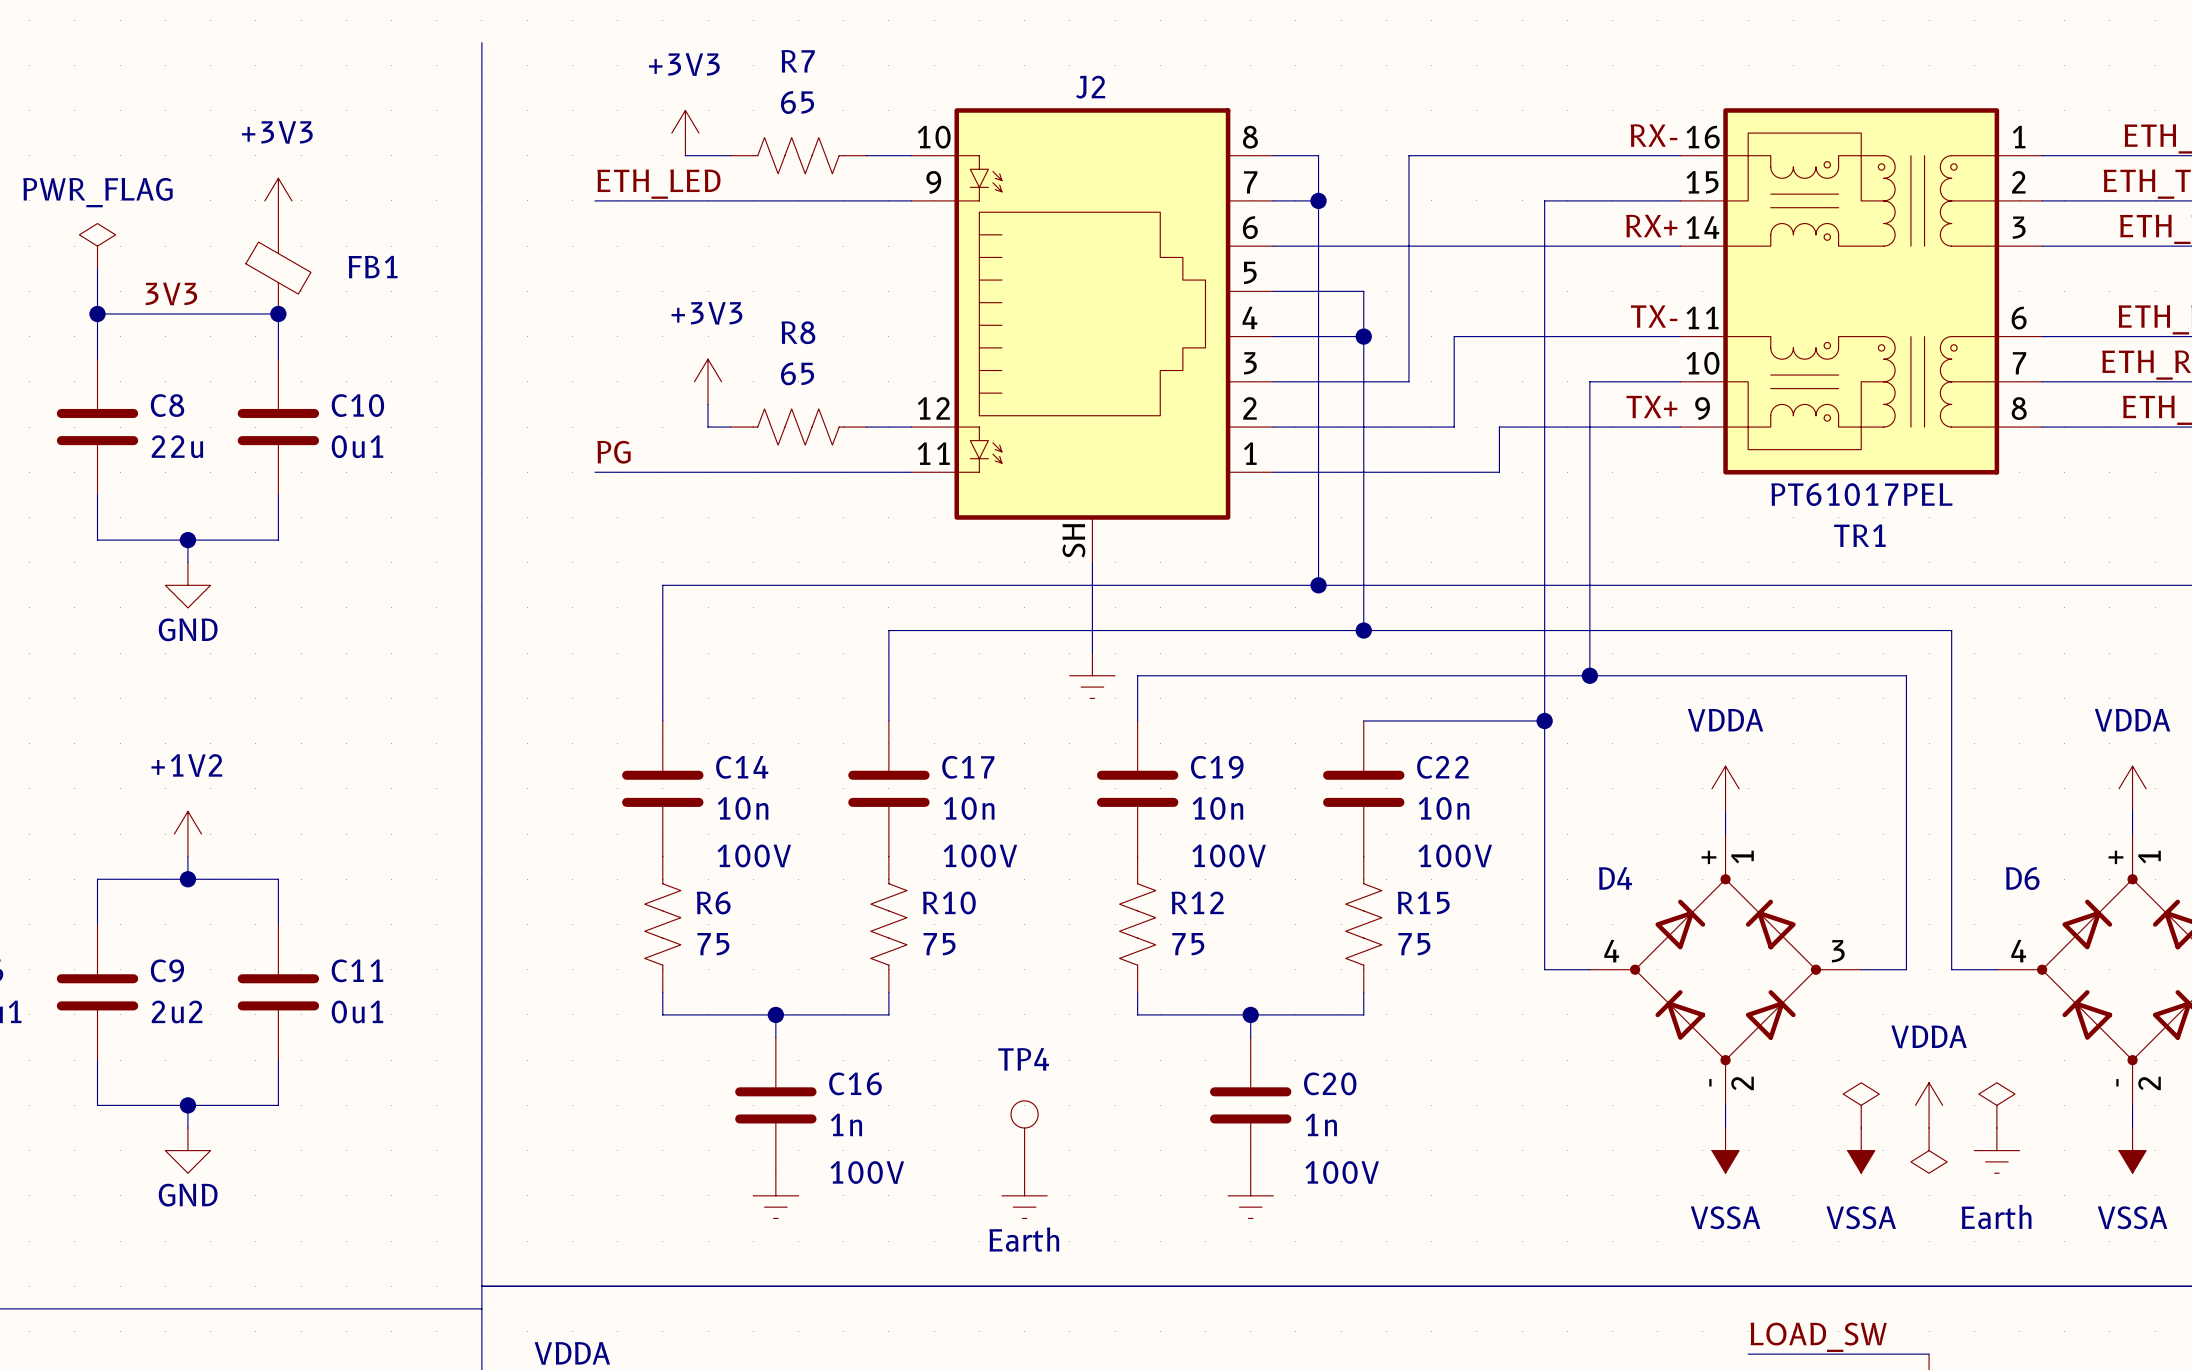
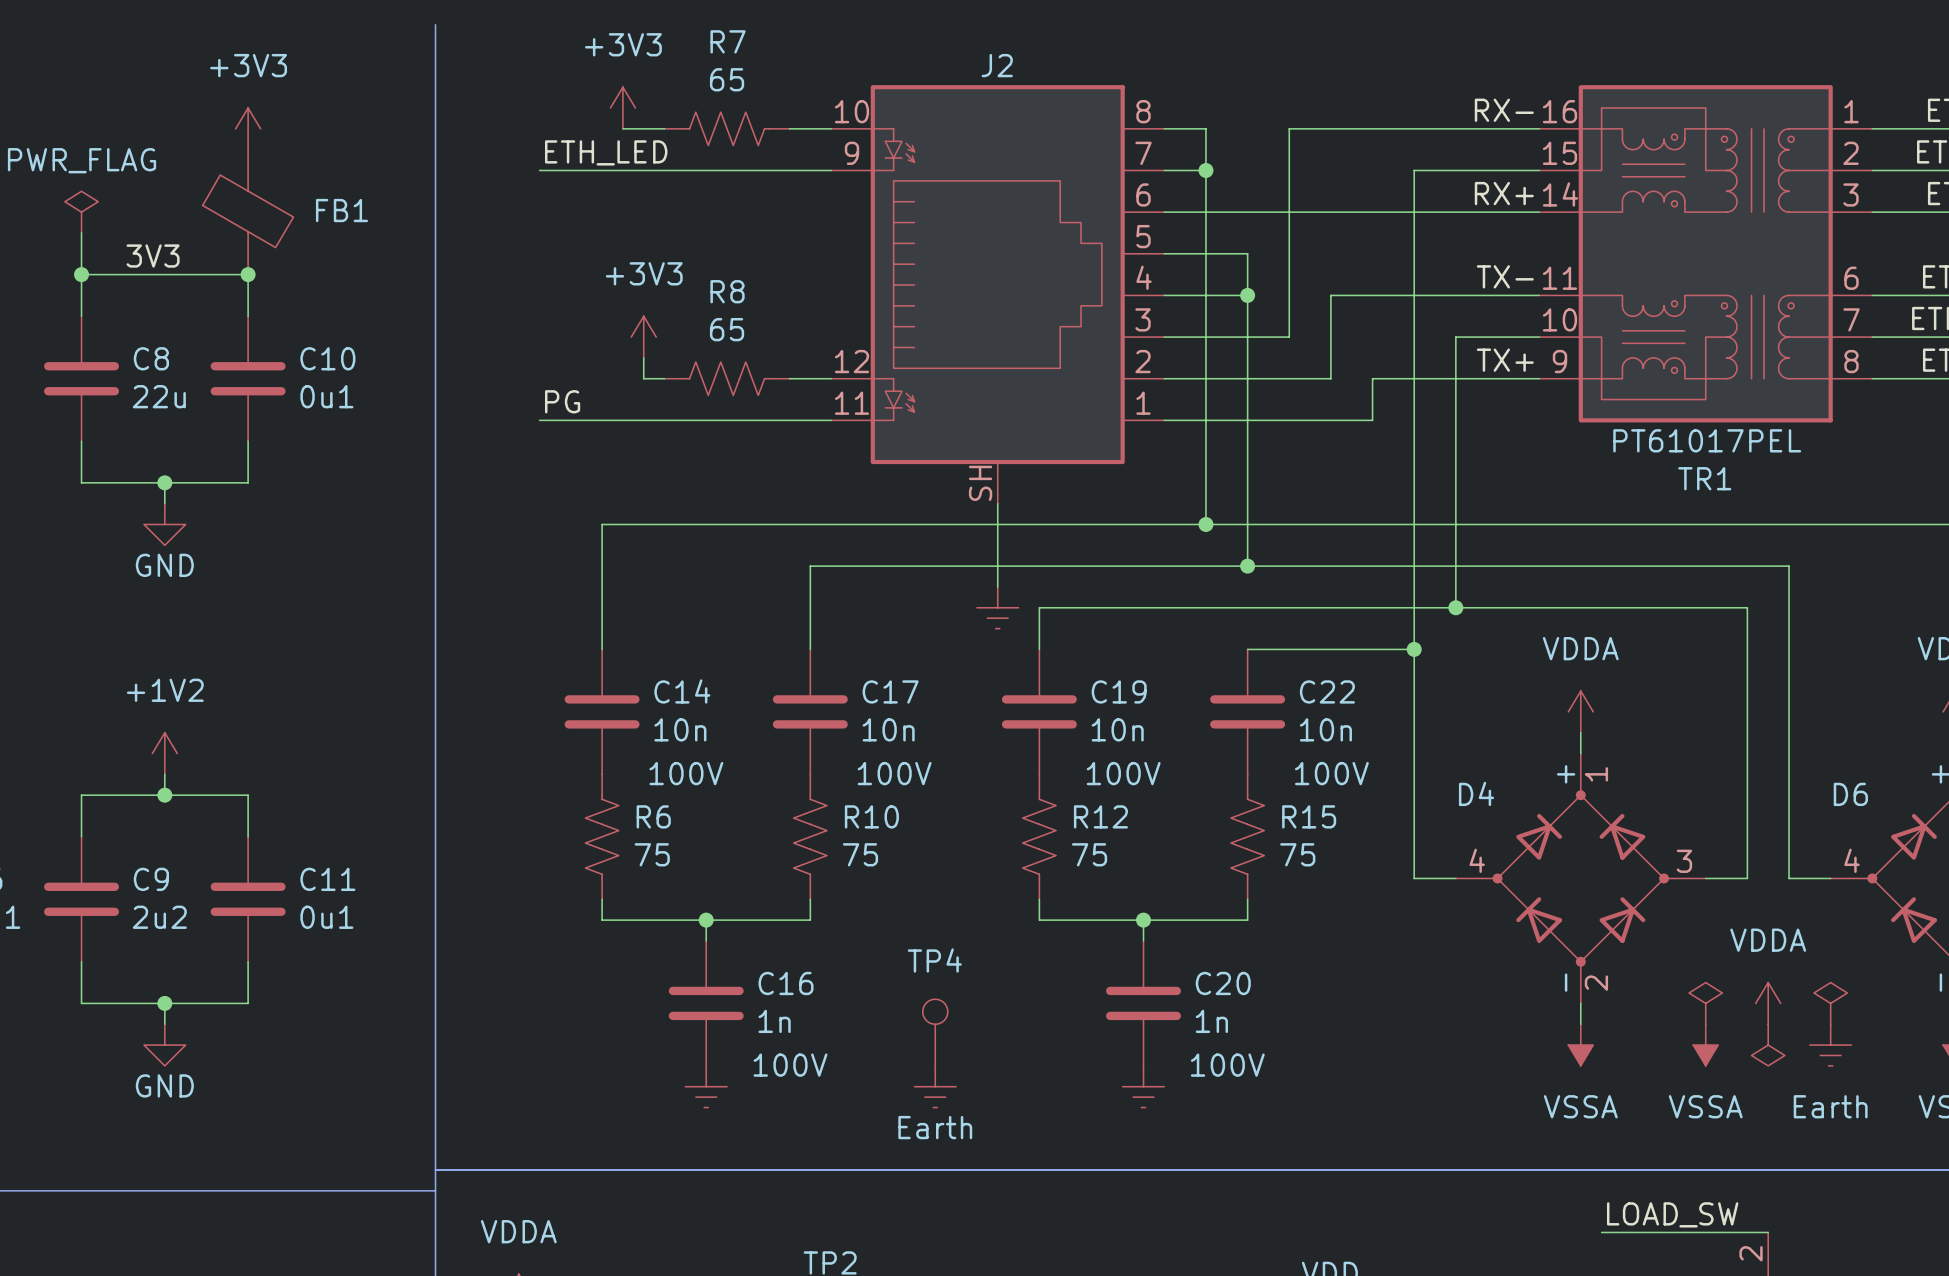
power symbol position: +3V3 (278, 200) -> +3V3 (248, 128)
FB1 symbol: [245, 223, 311, 314] -> [202, 149, 294, 275]

